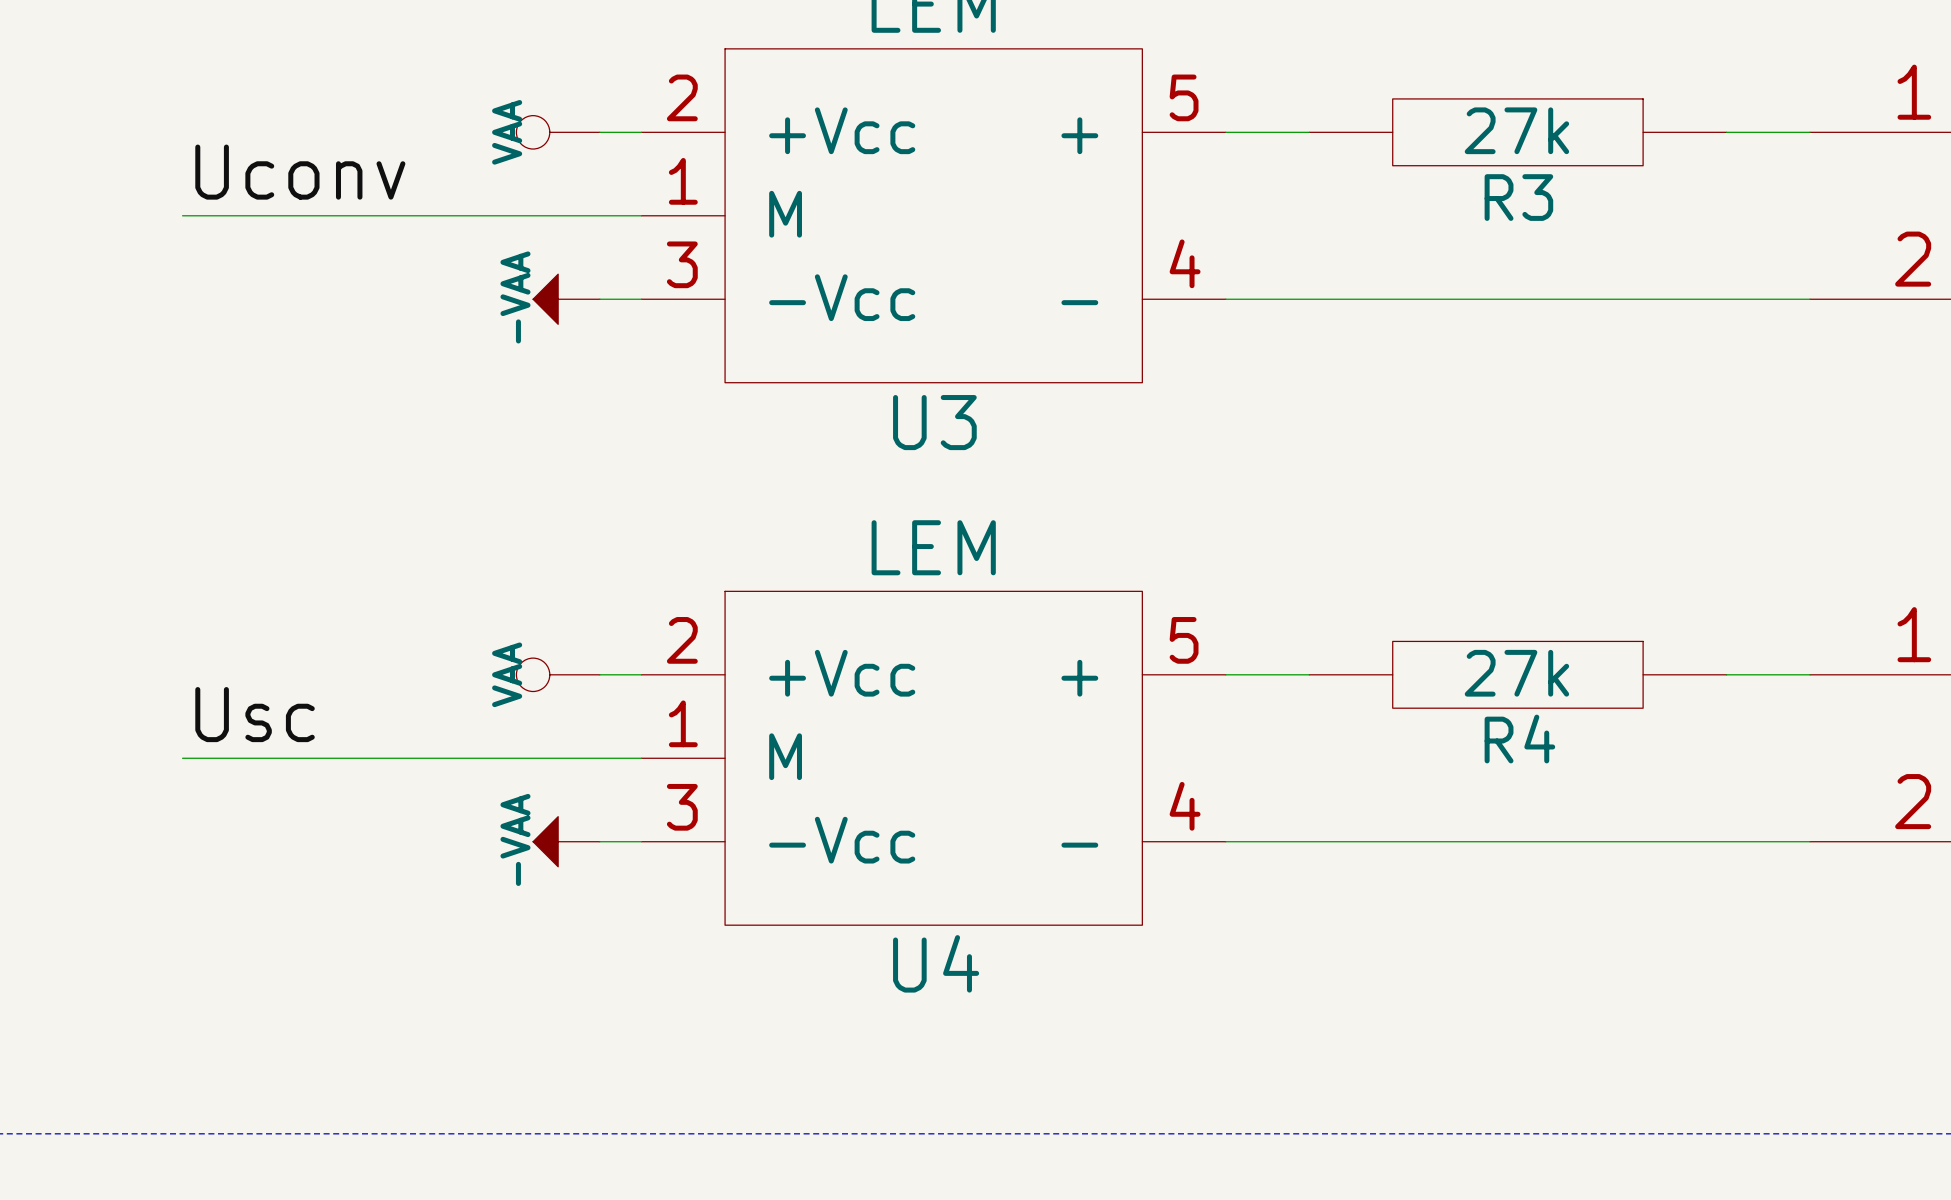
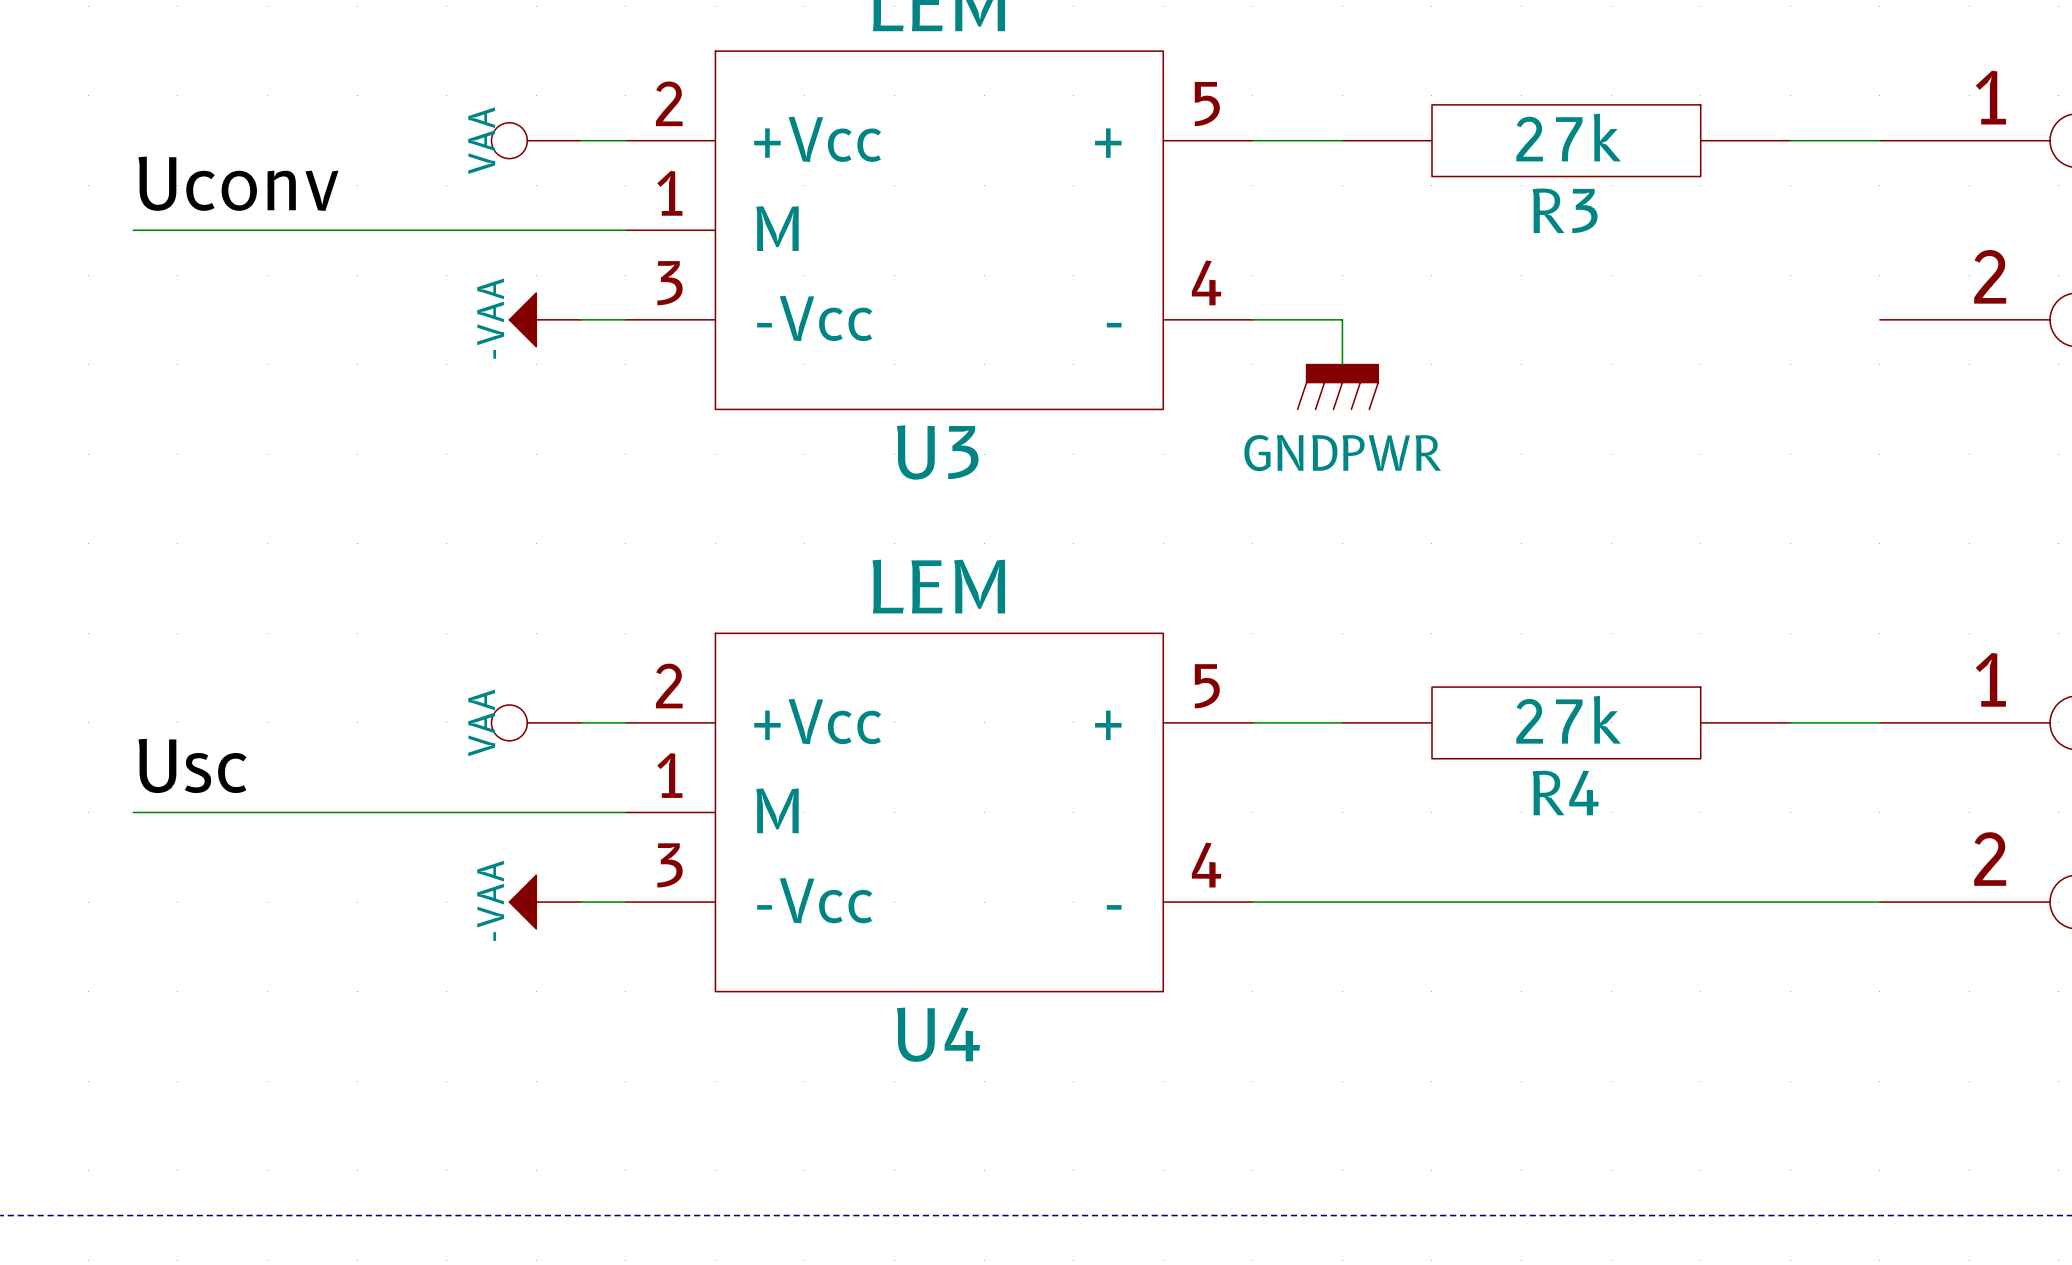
wire: (1309, 299) (1810, 299) -> (1342, 319) (1342, 364)
power symbol: none -> GNDPWR (1337, 387)

